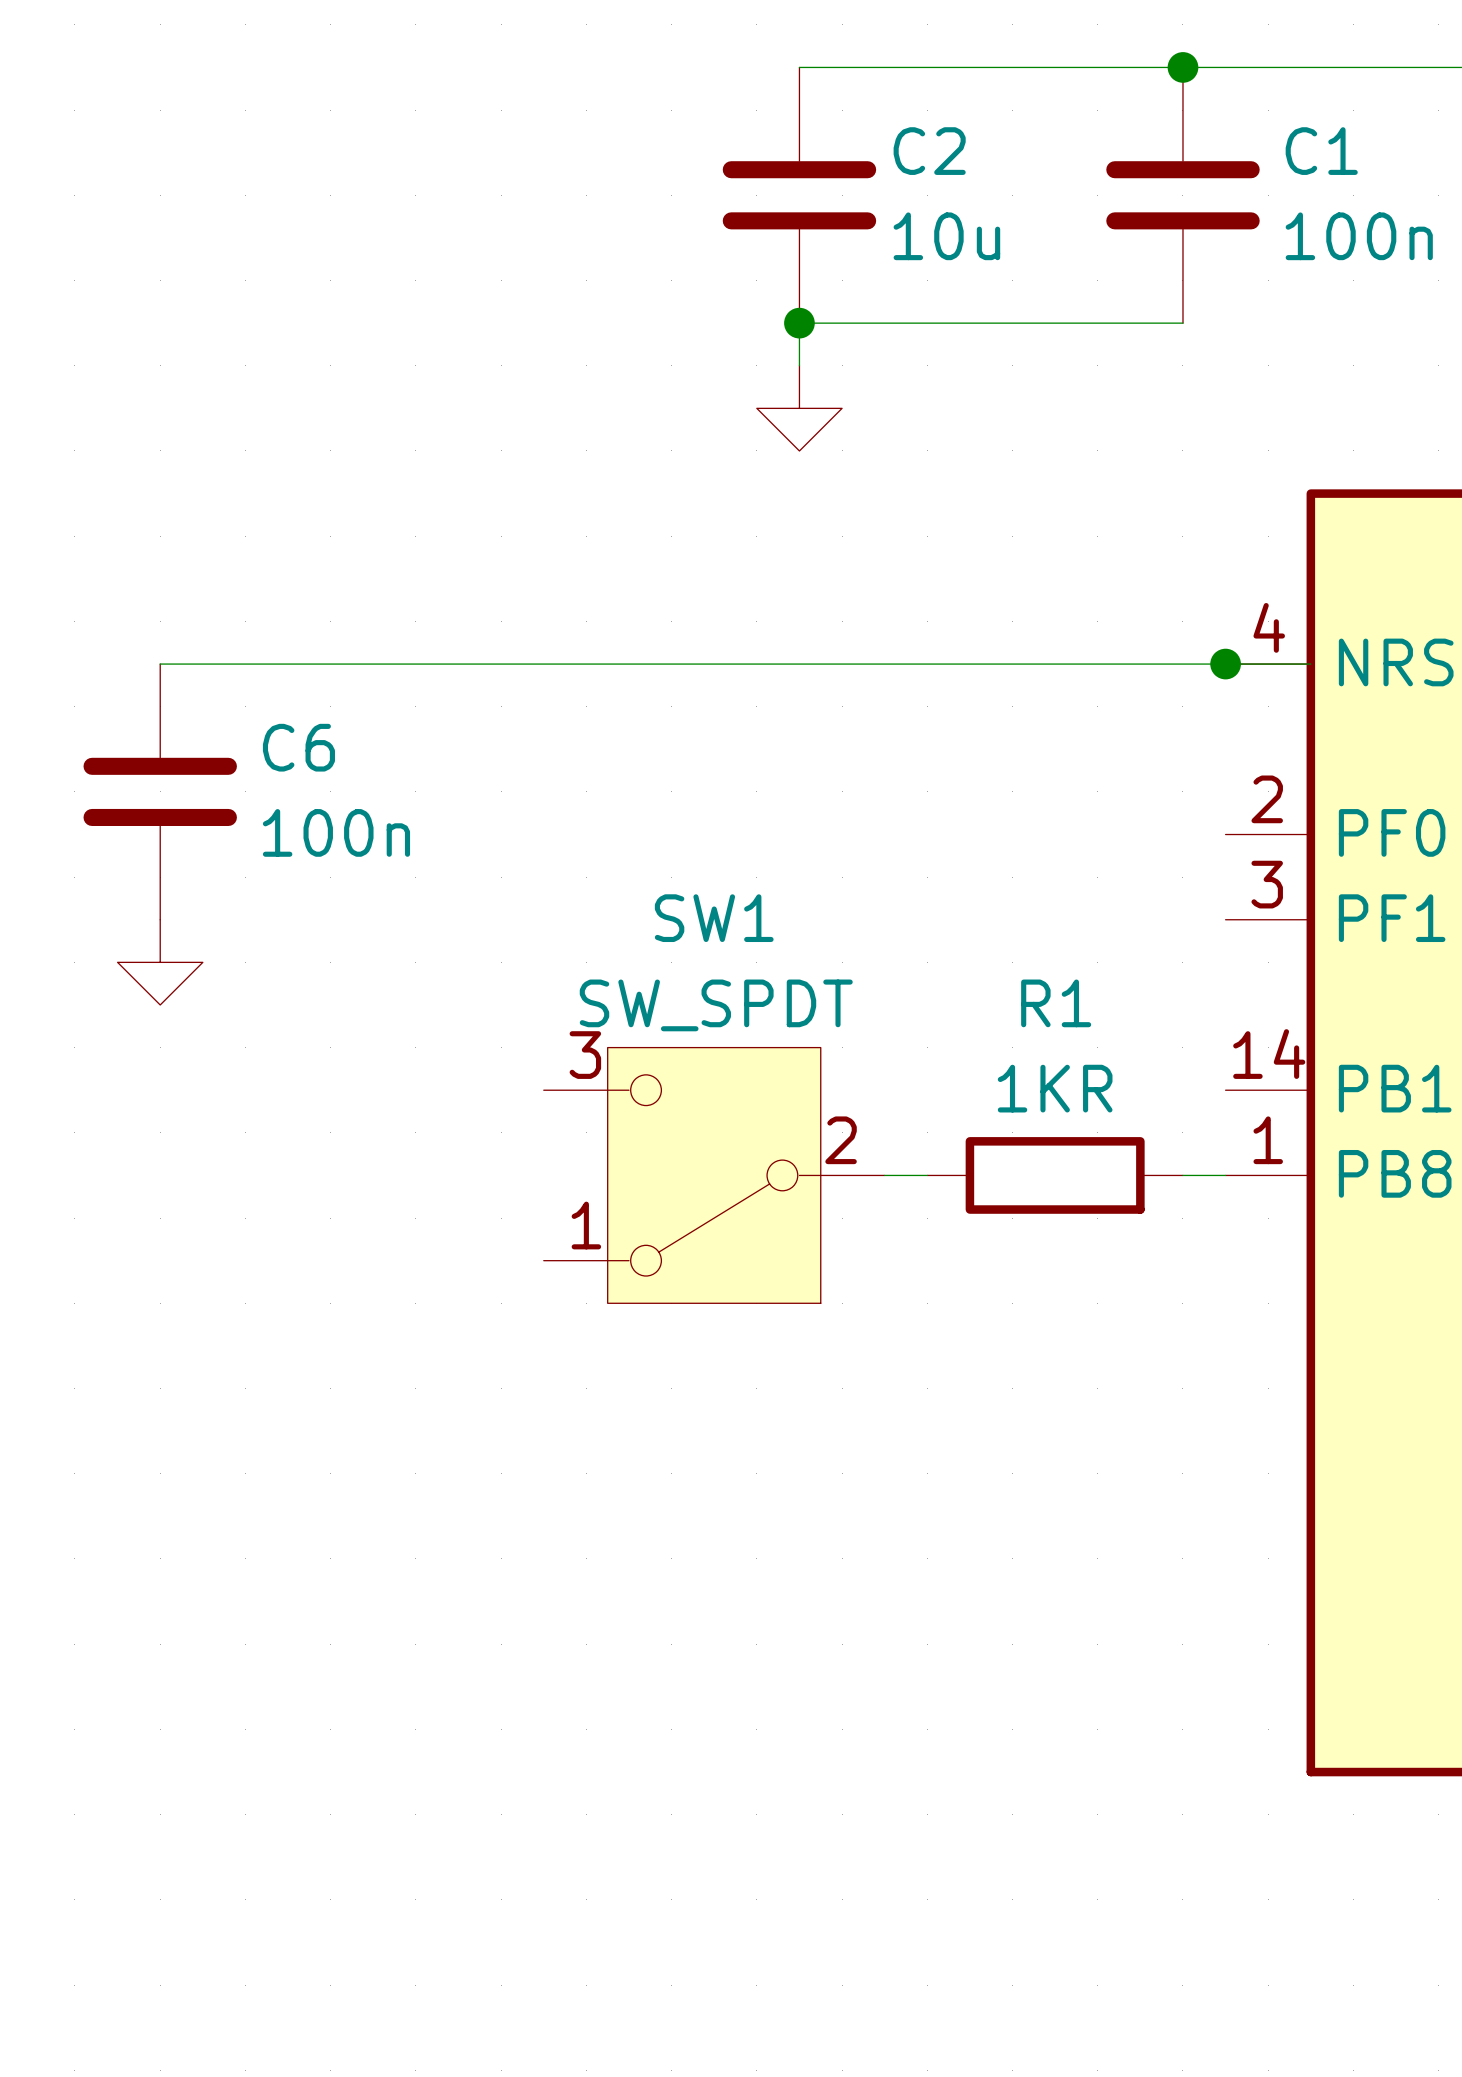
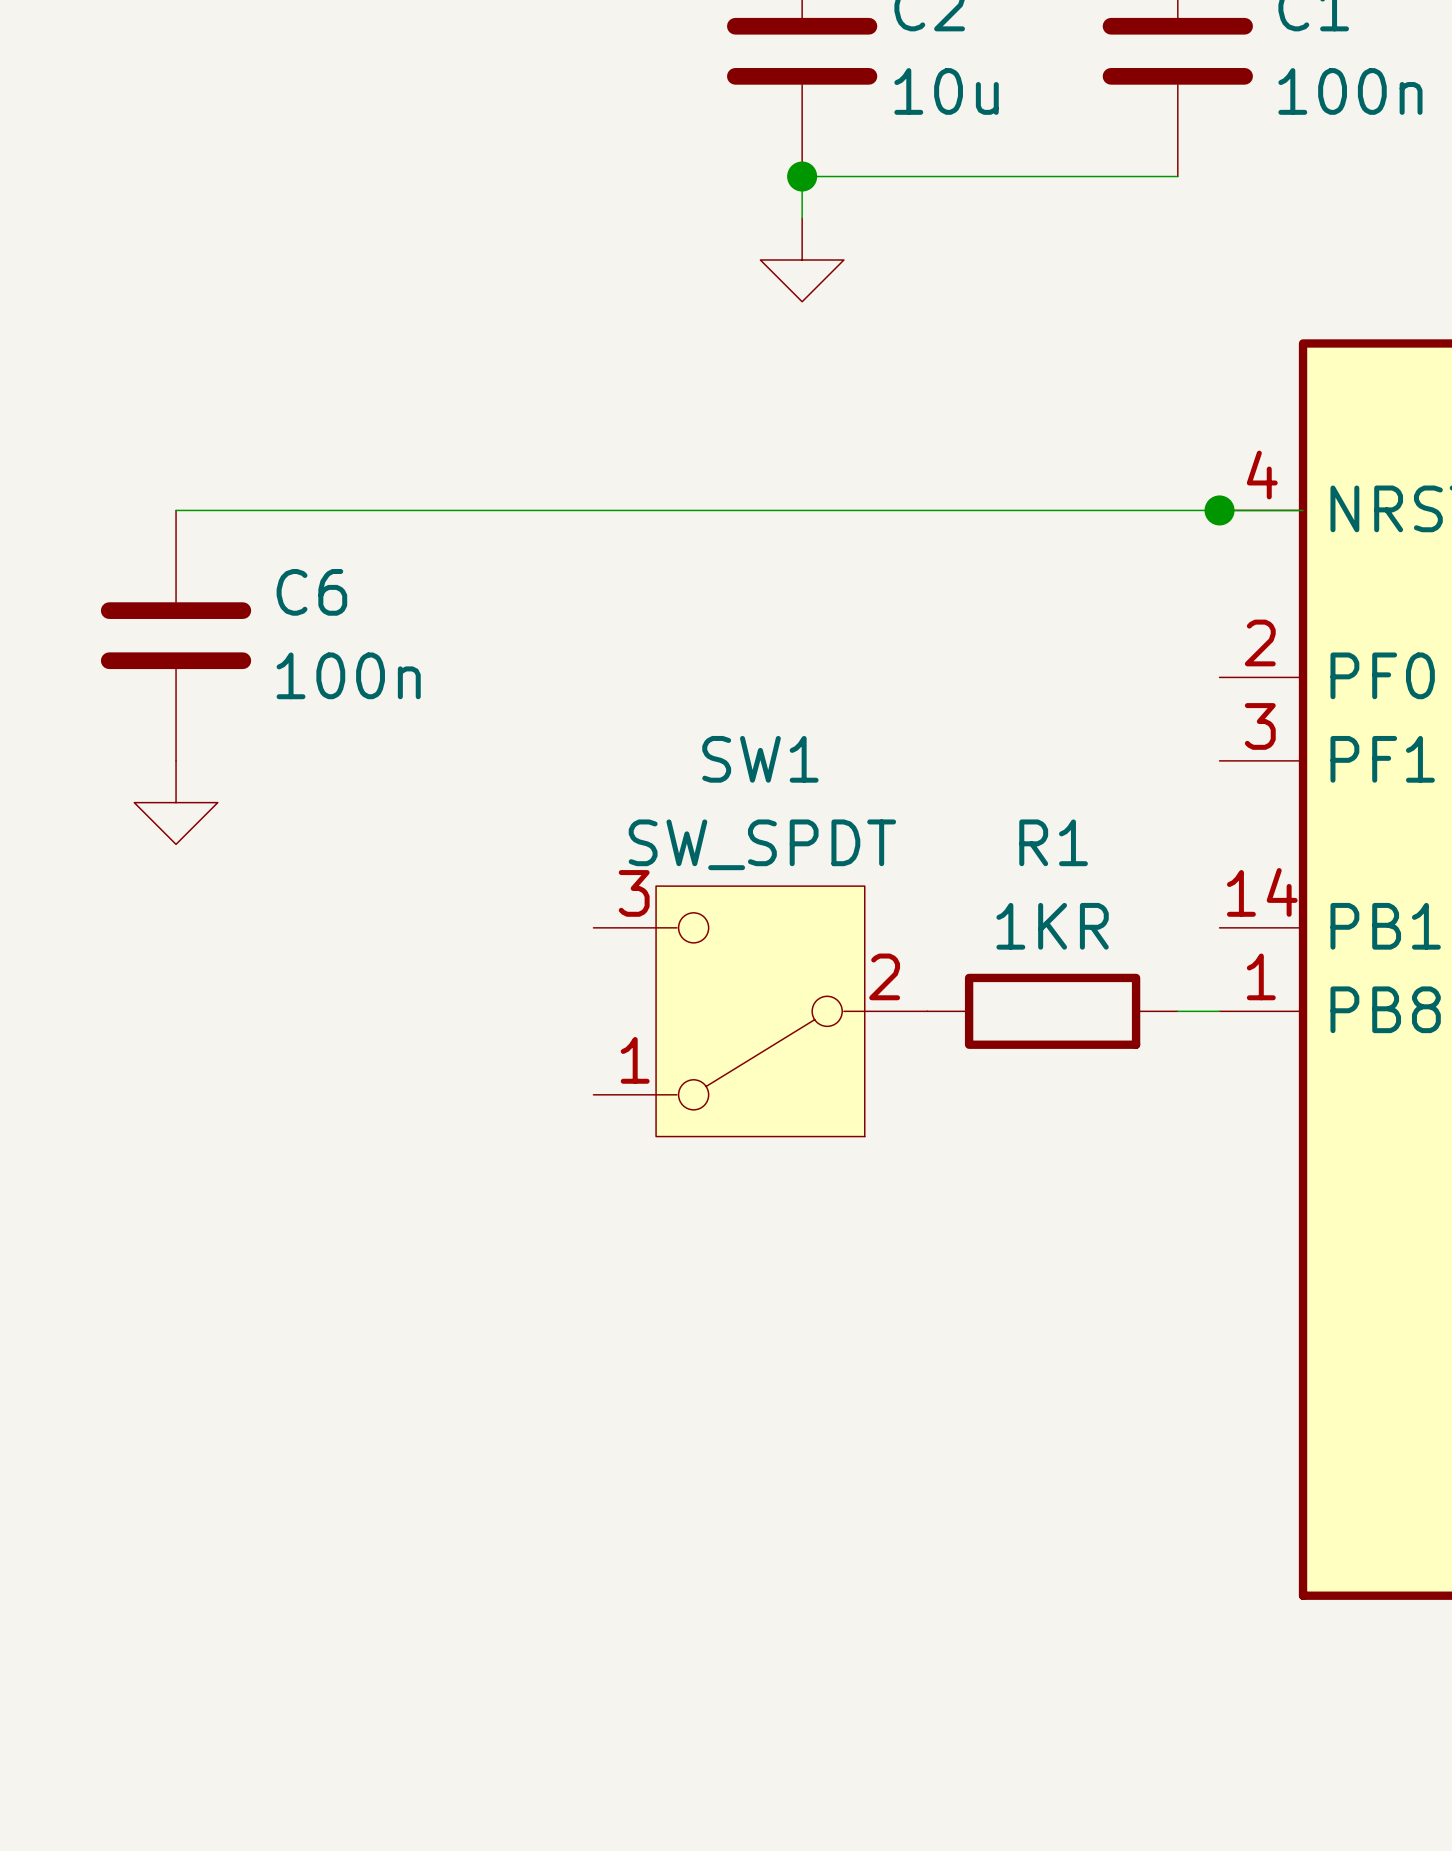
SW1 position: (714, 1175) -> (760, 1011)

